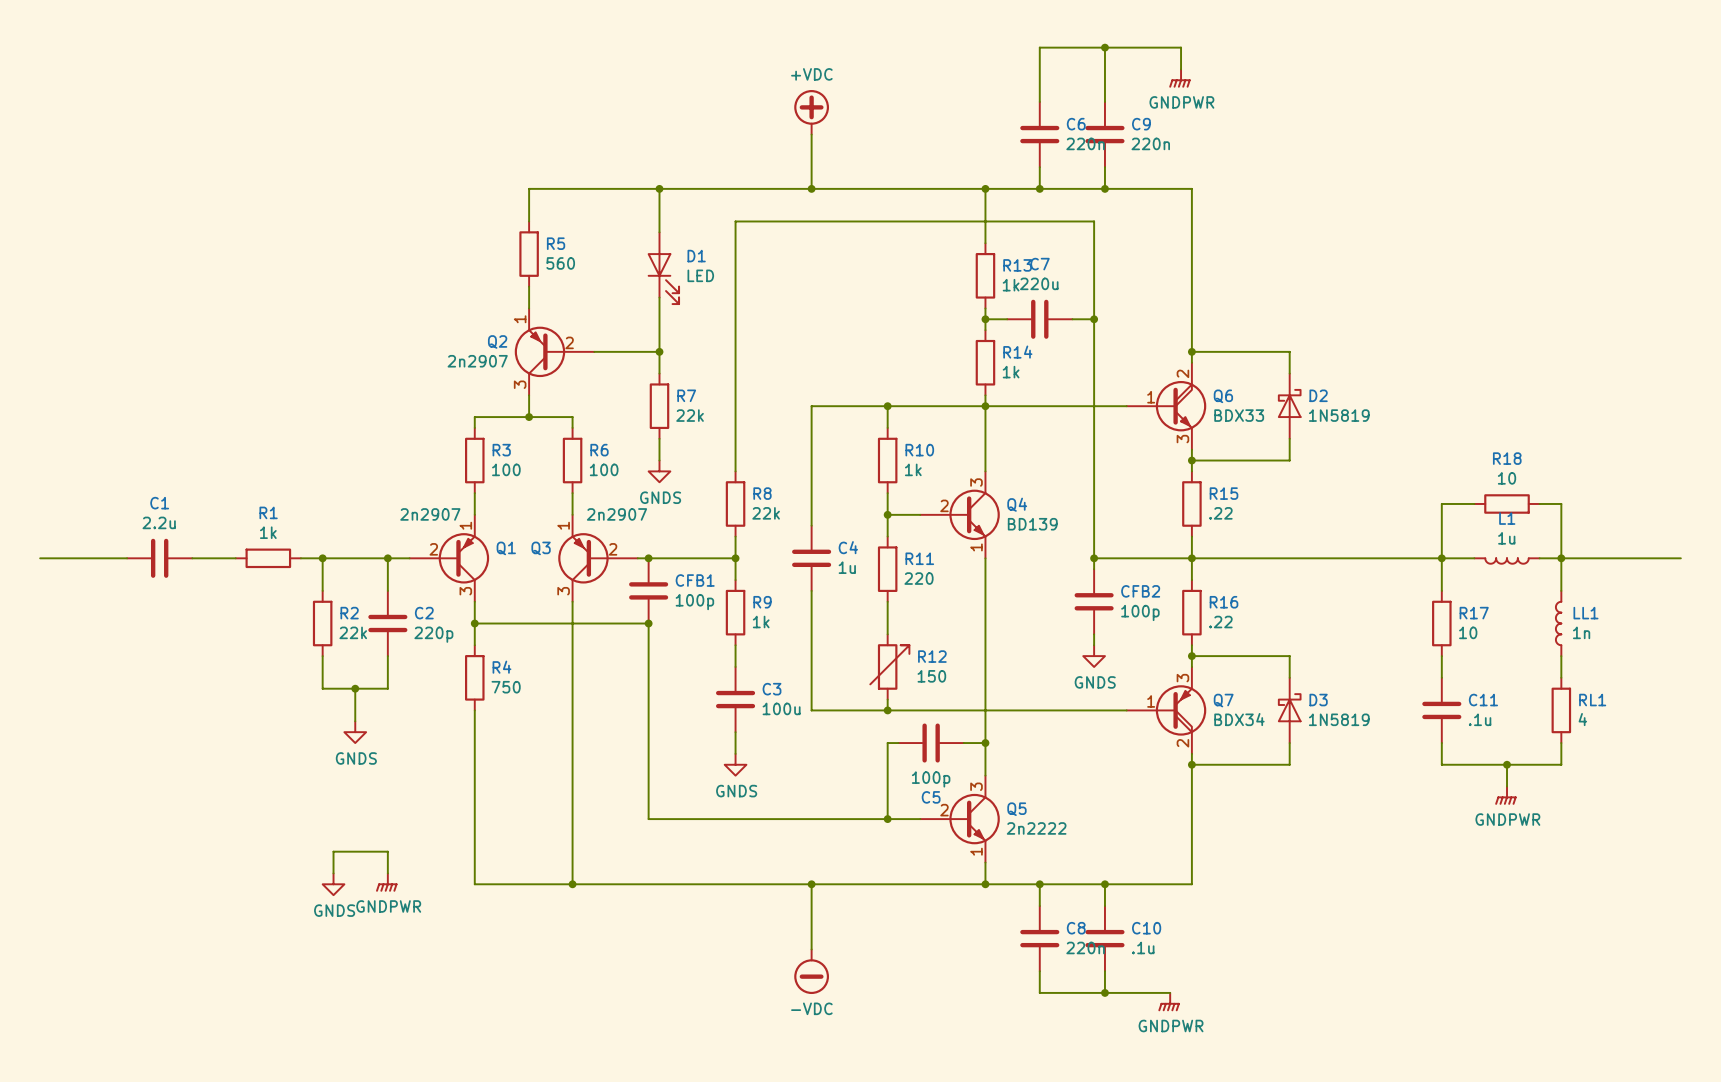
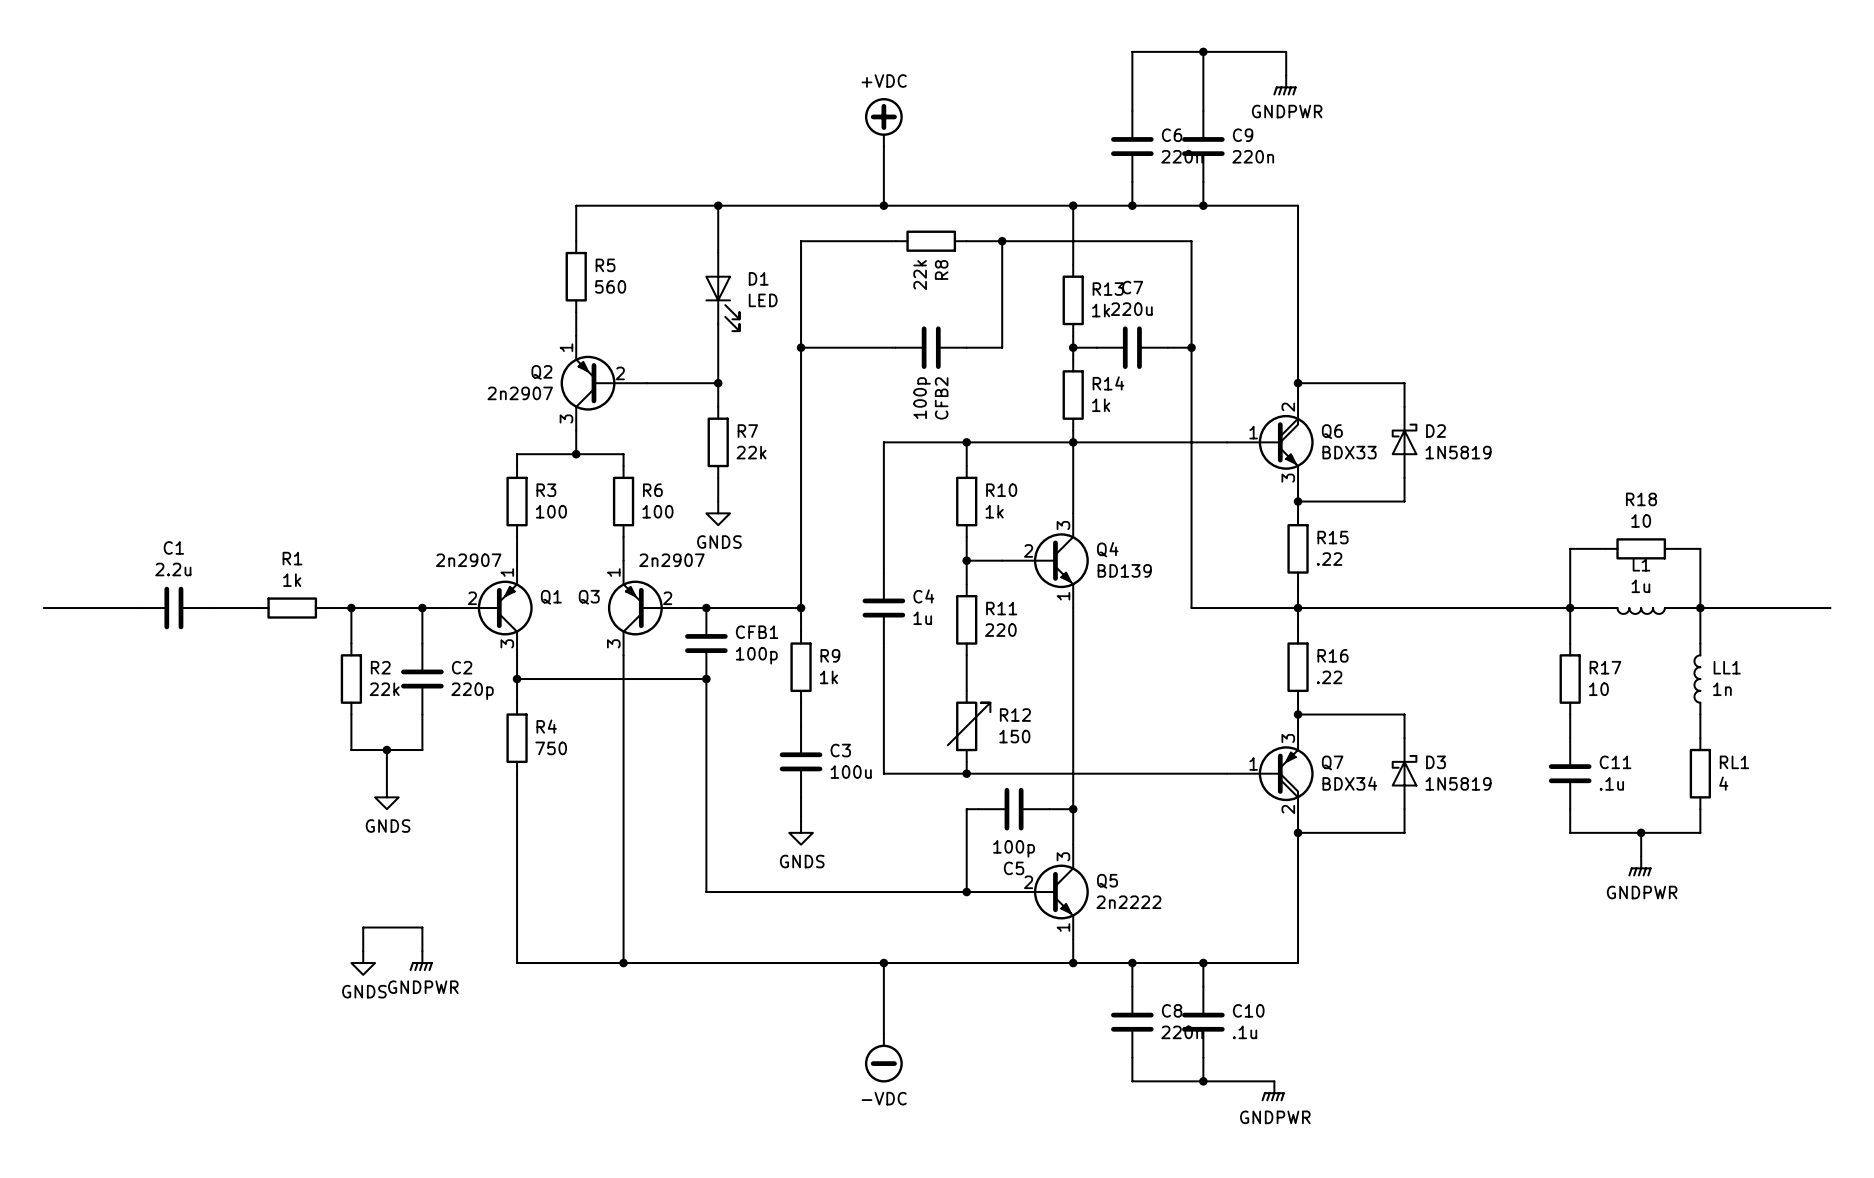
wire: (822, 221) (887, 221) -> none
wire: none -> (1002, 241) (1002, 347) (966, 347)
junction: none -> (1002, 241)
wire: none -> (801, 347) (895, 347)
junction: none -> (801, 347)
wire: none -> (801, 513) (801, 584)
R8 rotation: 0° (735, 503) -> 90° clockwise (931, 241)
R8 position: (735, 503) -> (931, 241)
wire: (1094, 558) (1094, 569) -> none
junction: (1094, 558) -> none
CFB2 rotation: 0° (1094, 601) -> 90° clockwise (931, 347)
CFB2 position: (1094, 601) -> (931, 347)
wire: (1094, 634) (1094, 645) -> none
power symbol: GNDS (1094, 656) -> none

